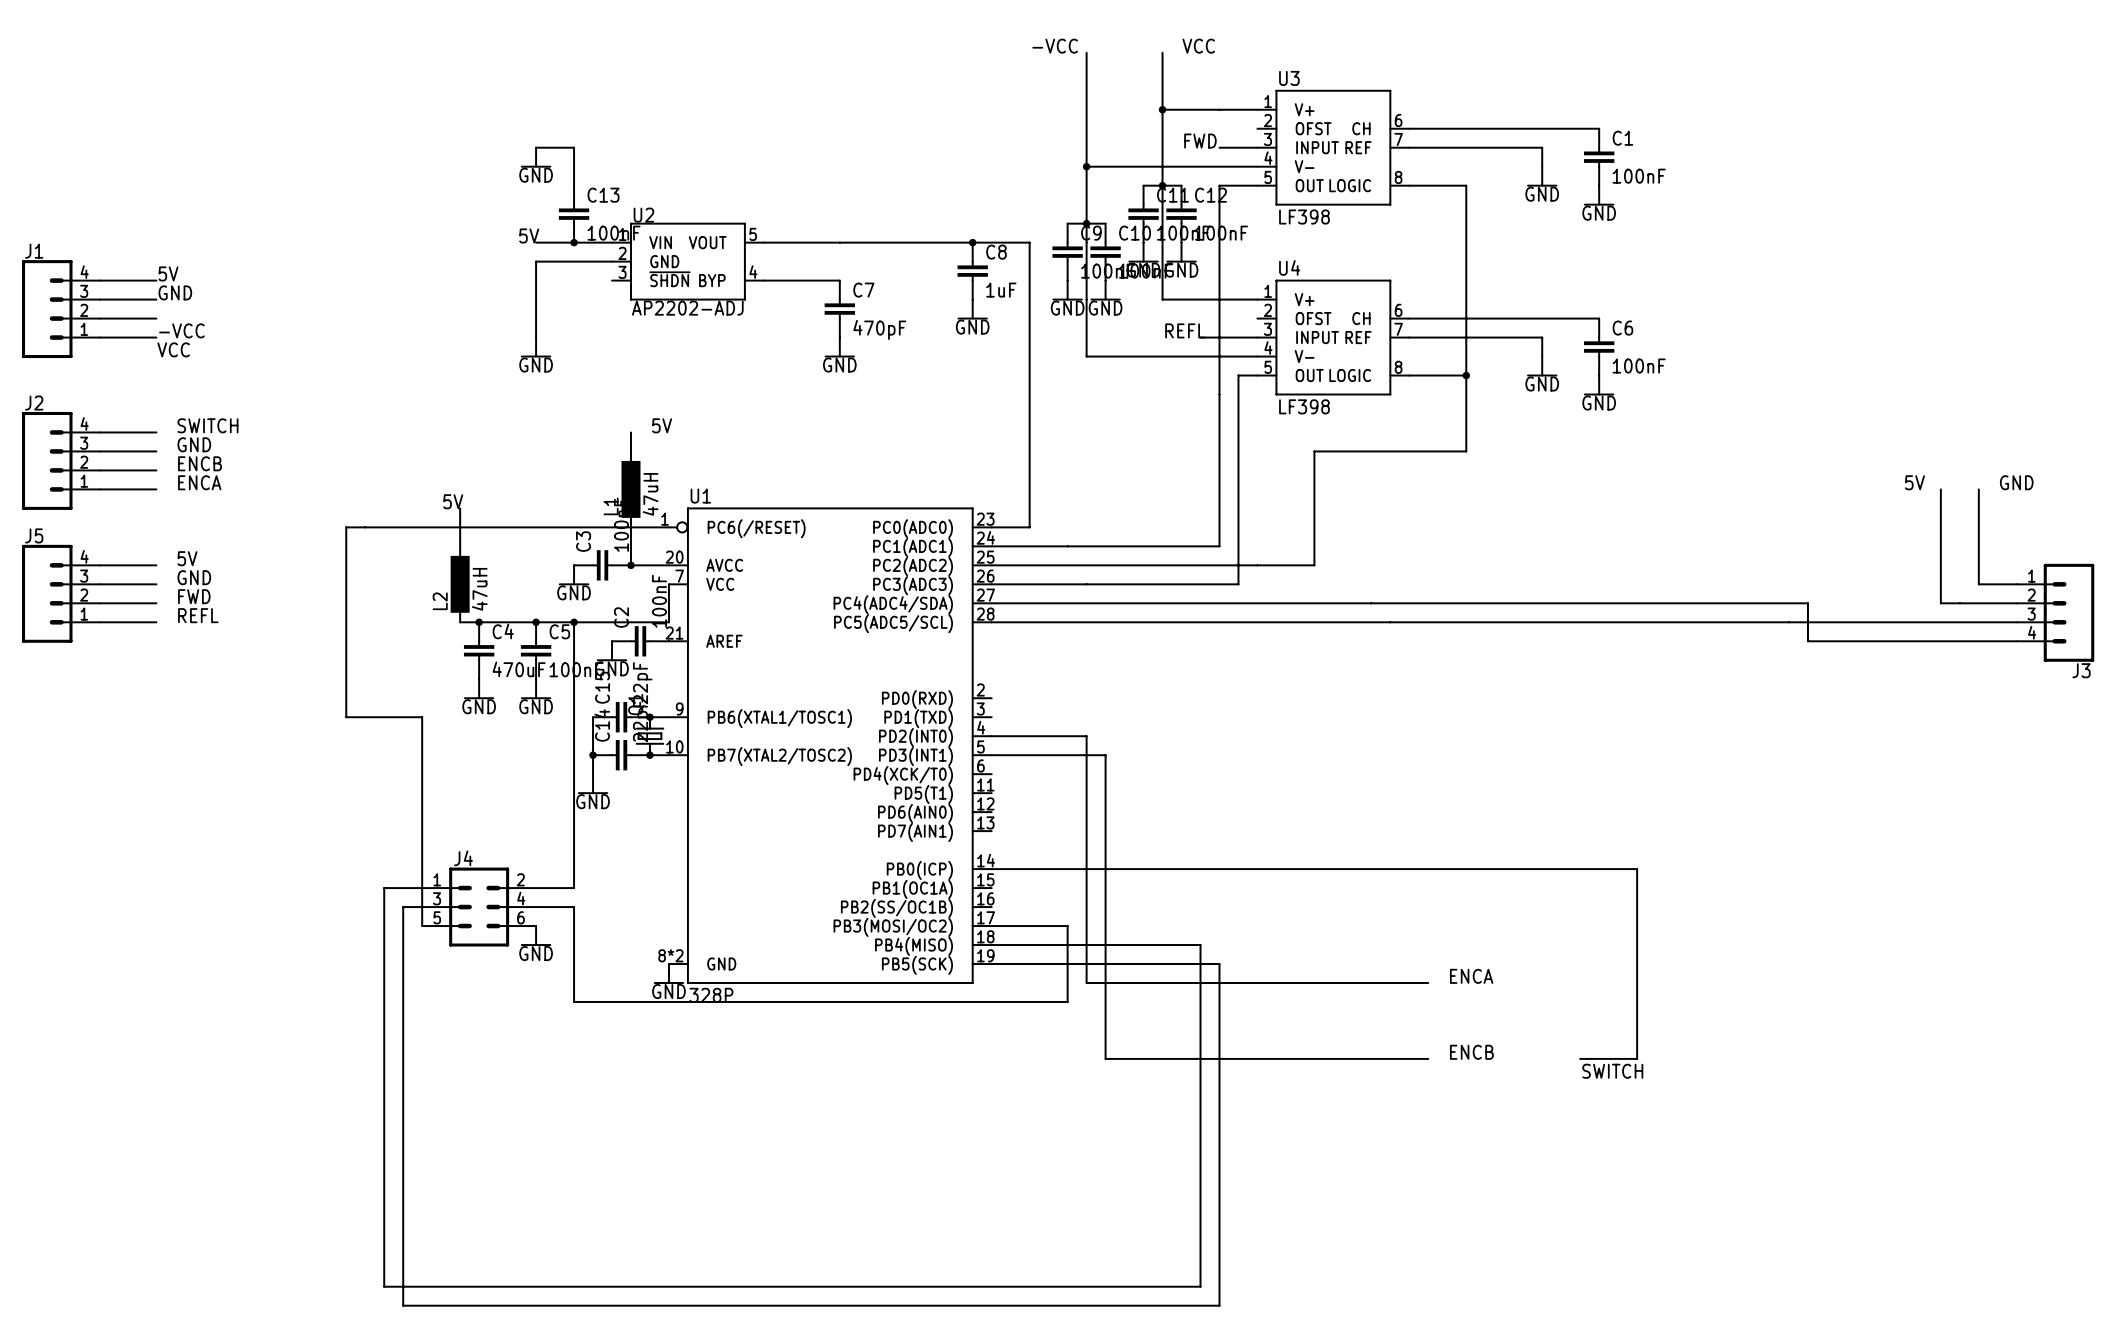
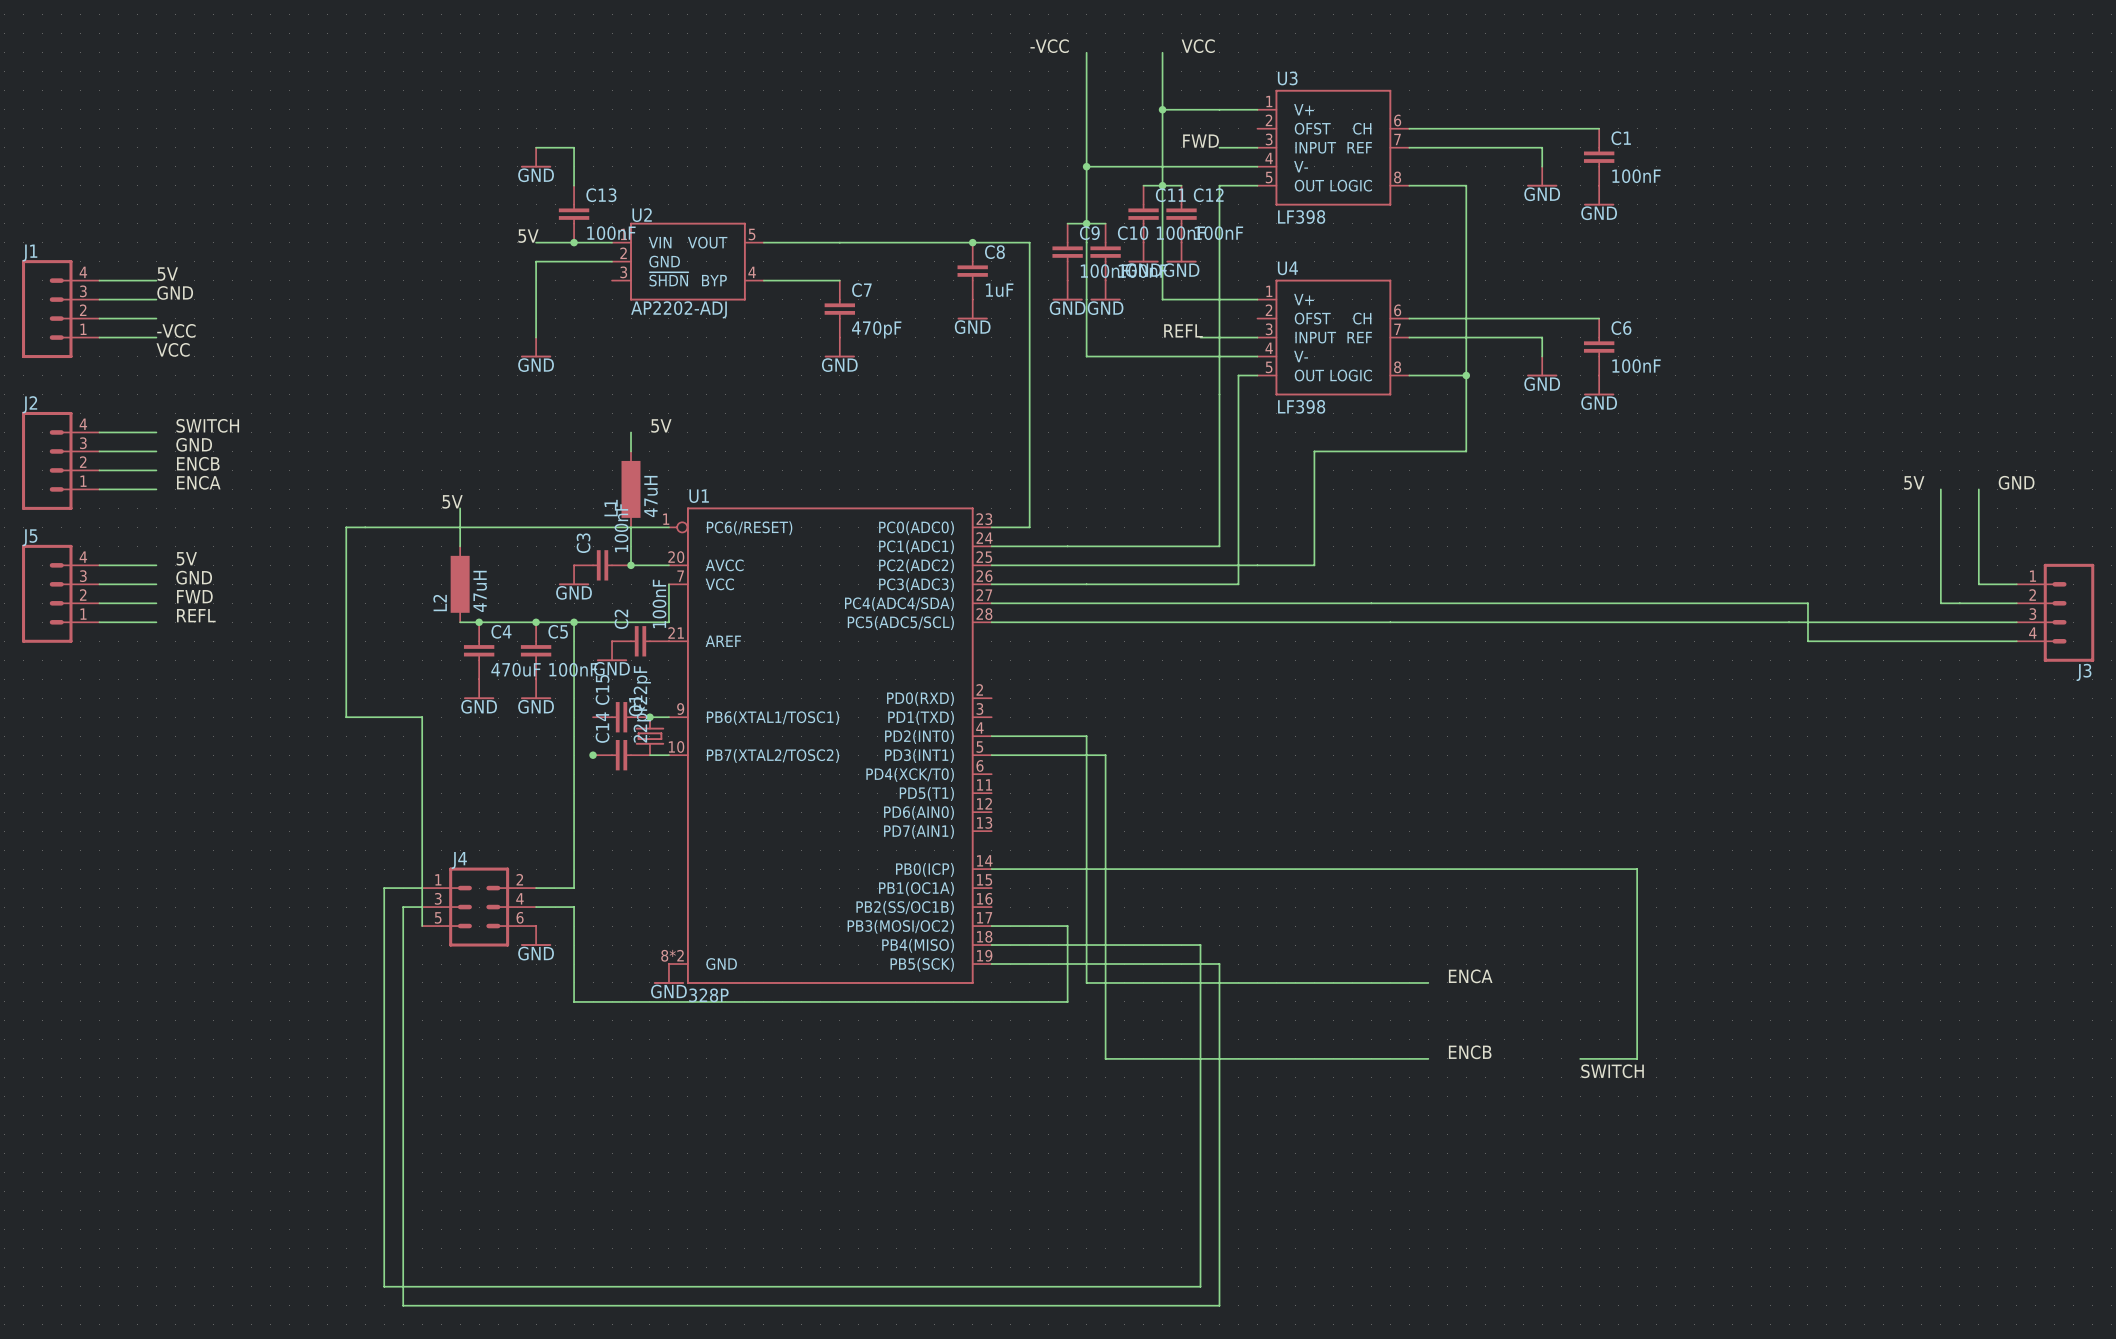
wire: (593, 717) (593, 774) -> none
junction: (649, 755) -> none
power symbol: GND (593, 784) -> none

